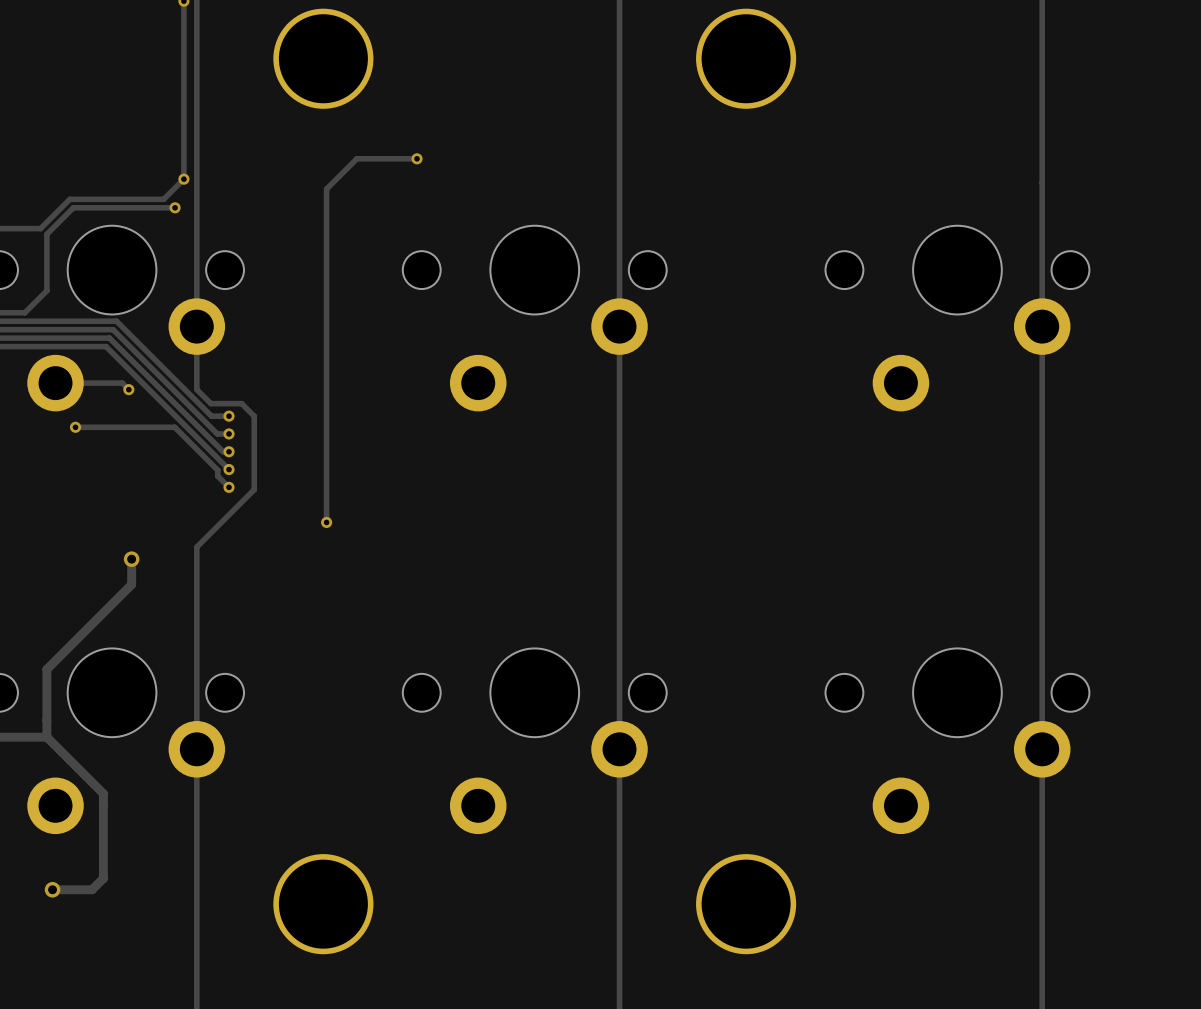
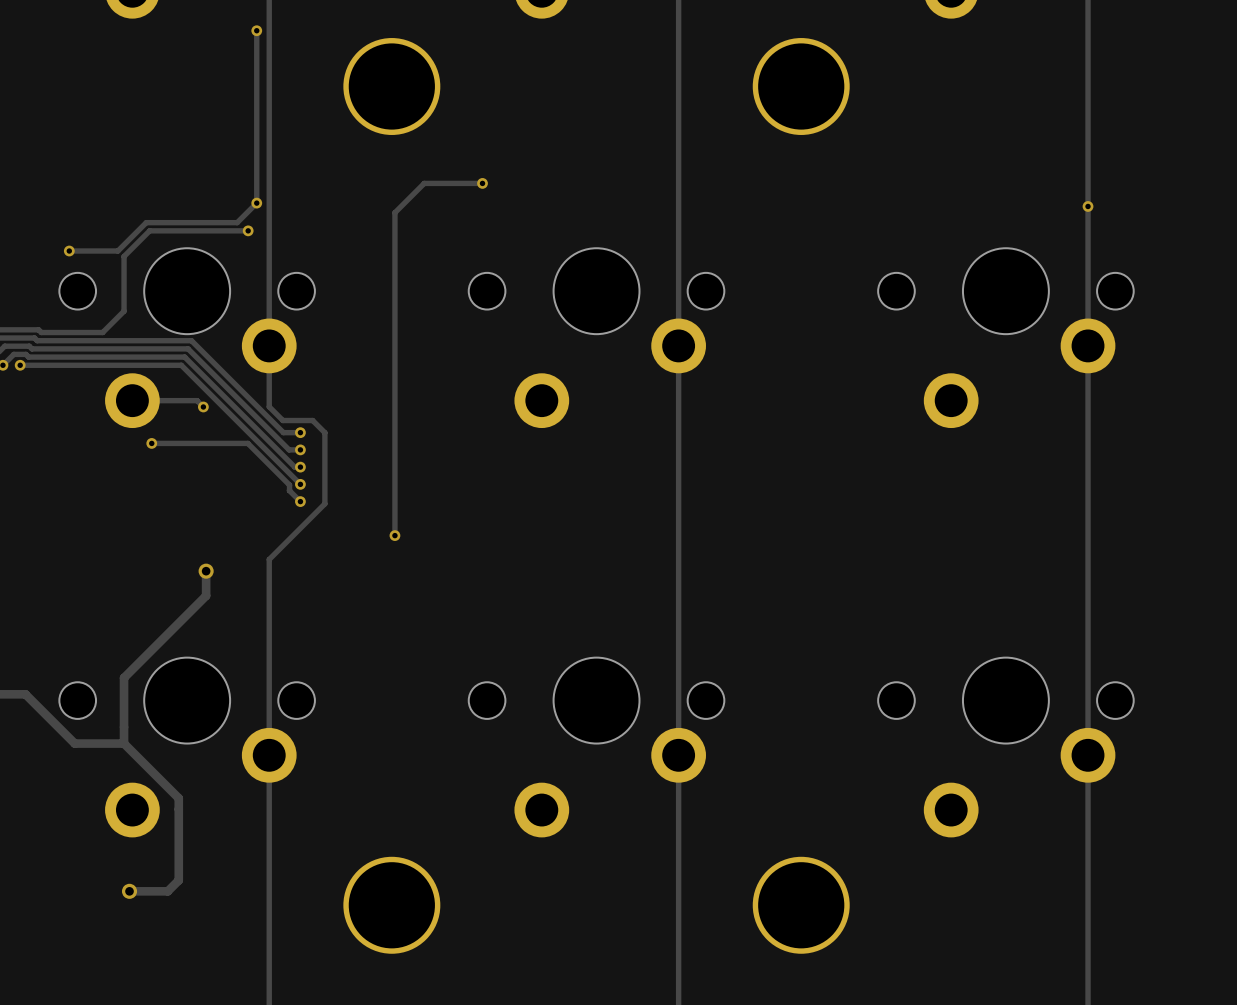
via: none -> (1088, 206)

